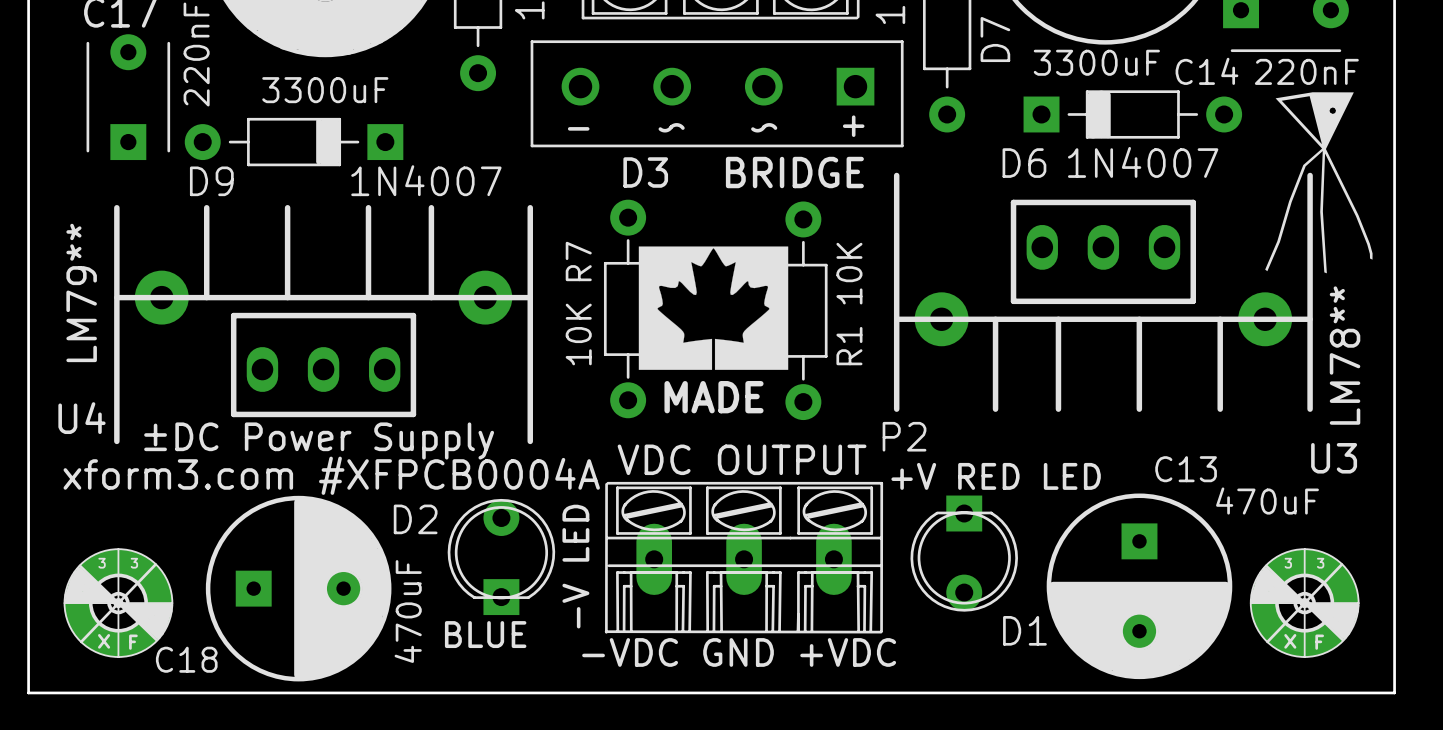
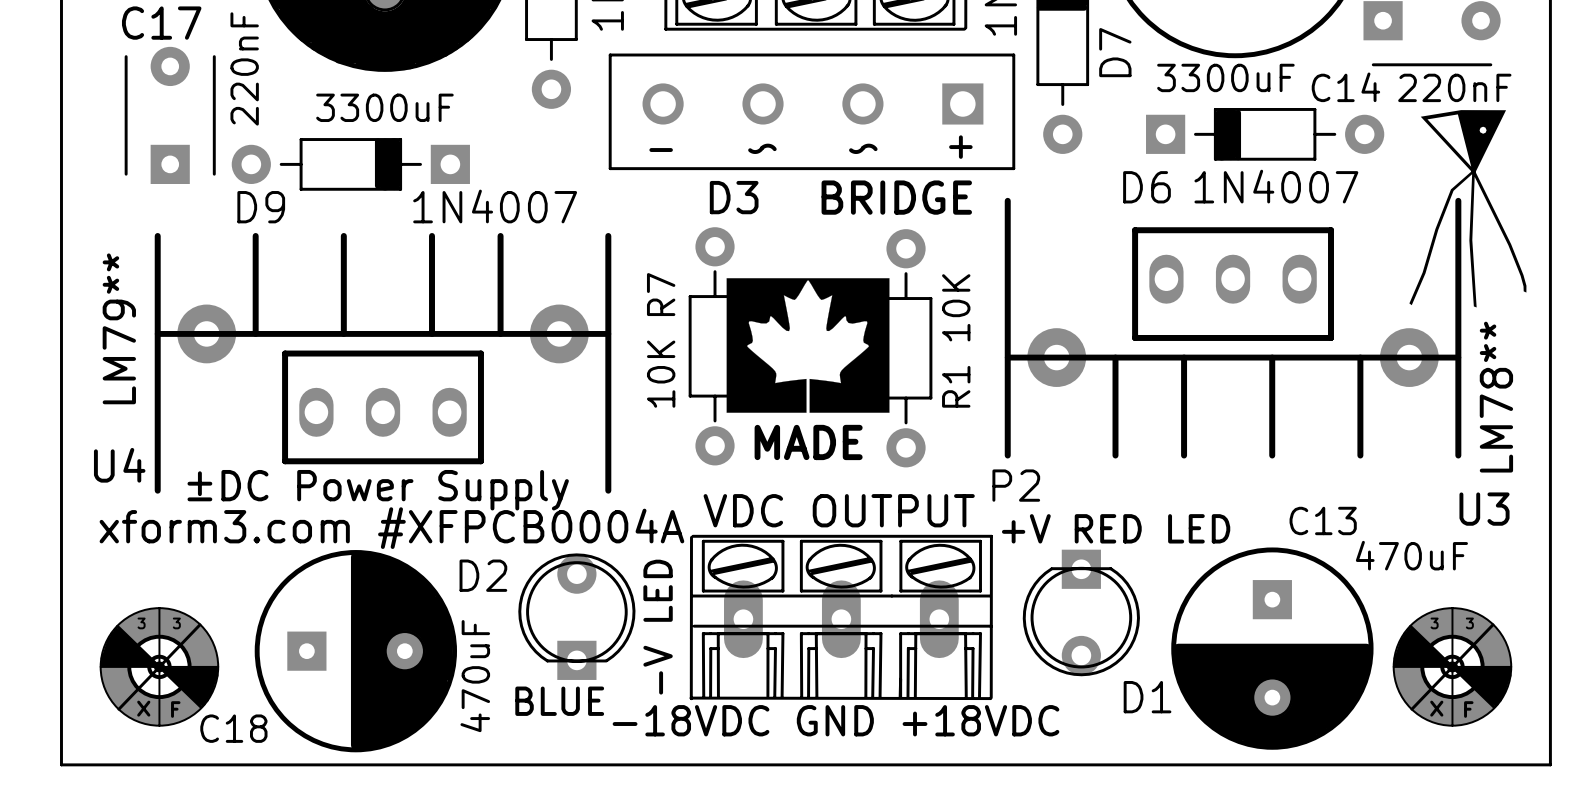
text: -VDC GND +VDC (739, 652) -> -18VDC GND +18VDC (835, 720)

